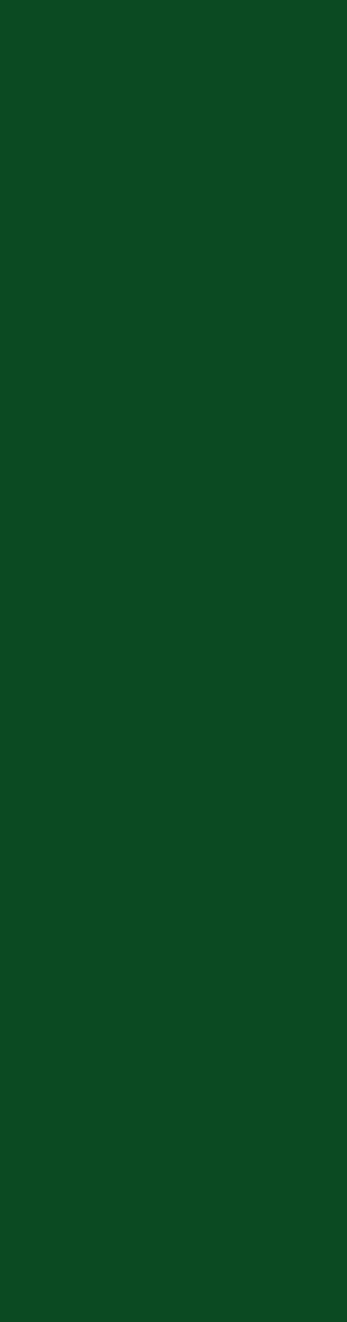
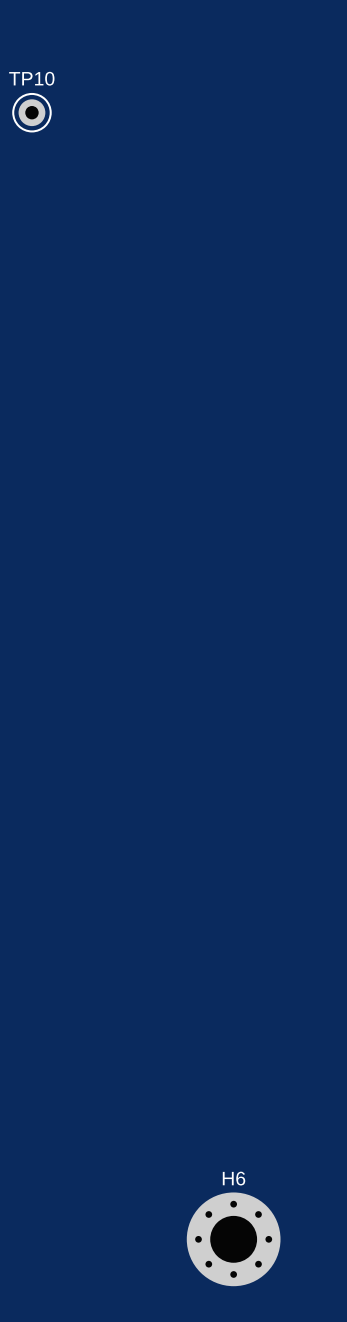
TP10: none -> (31, 112)
H6: none -> (233, 1239)

